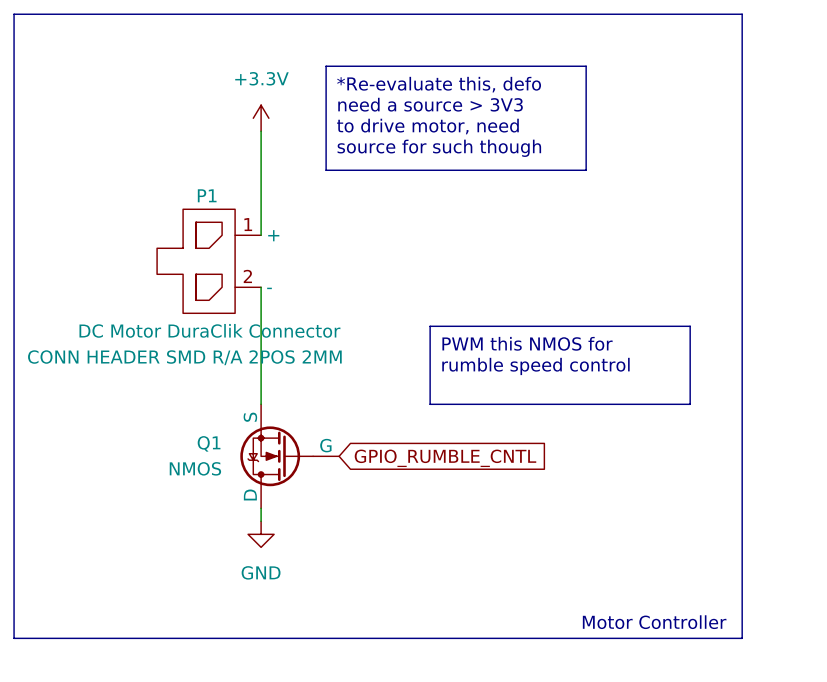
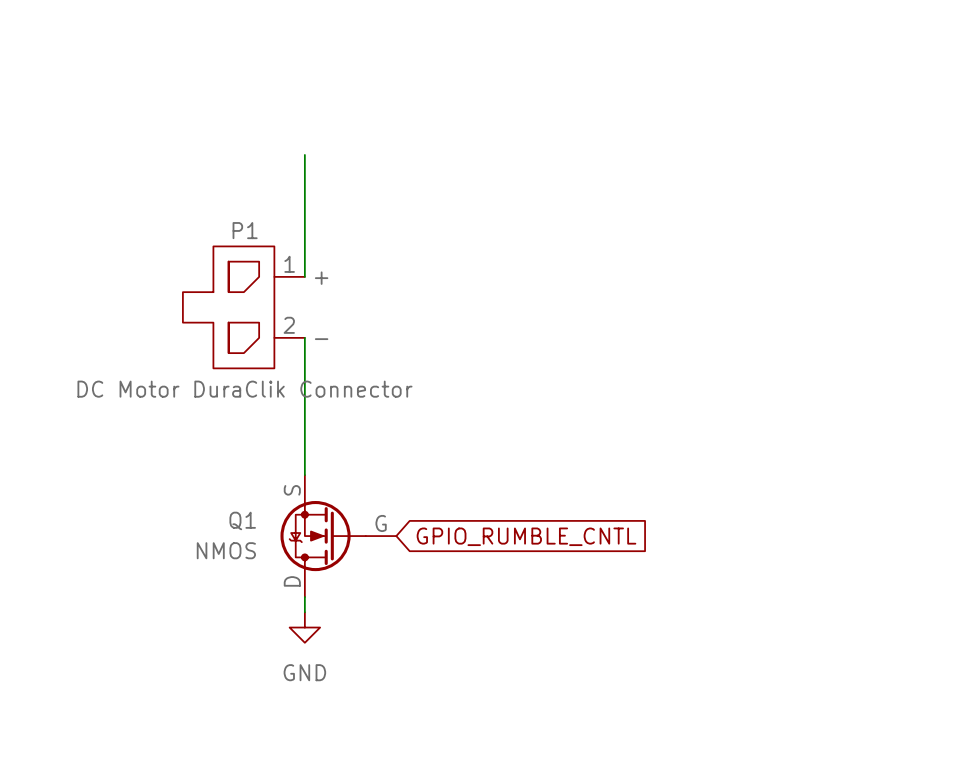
line: (14, 14) (742, 14) (742, 638) (14, 638) (14, 14) -> none
line: (326, 66) (586, 66) (586, 170) (326, 170) (326, 66) -> none
text: *Re-evaluate this, defo (439, 84) -> none
text: need a source > 3V3 (430, 104) -> none
power symbol: +3.3V (261, 118) -> none
text: to drive motor, need (427, 126) -> none
text: source for such though (439, 148) -> none
line: (430, 326) (690, 326) (690, 404) (430, 404) (430, 326) -> none
text: PWM this NMOS for (527, 343) -> none
P1 value: CONN HEADER SMD R/A 2POS 2MM (184, 357) -> none
text: rumble speed control (535, 366) -> none
text: Motor Controller (654, 622) -> none

